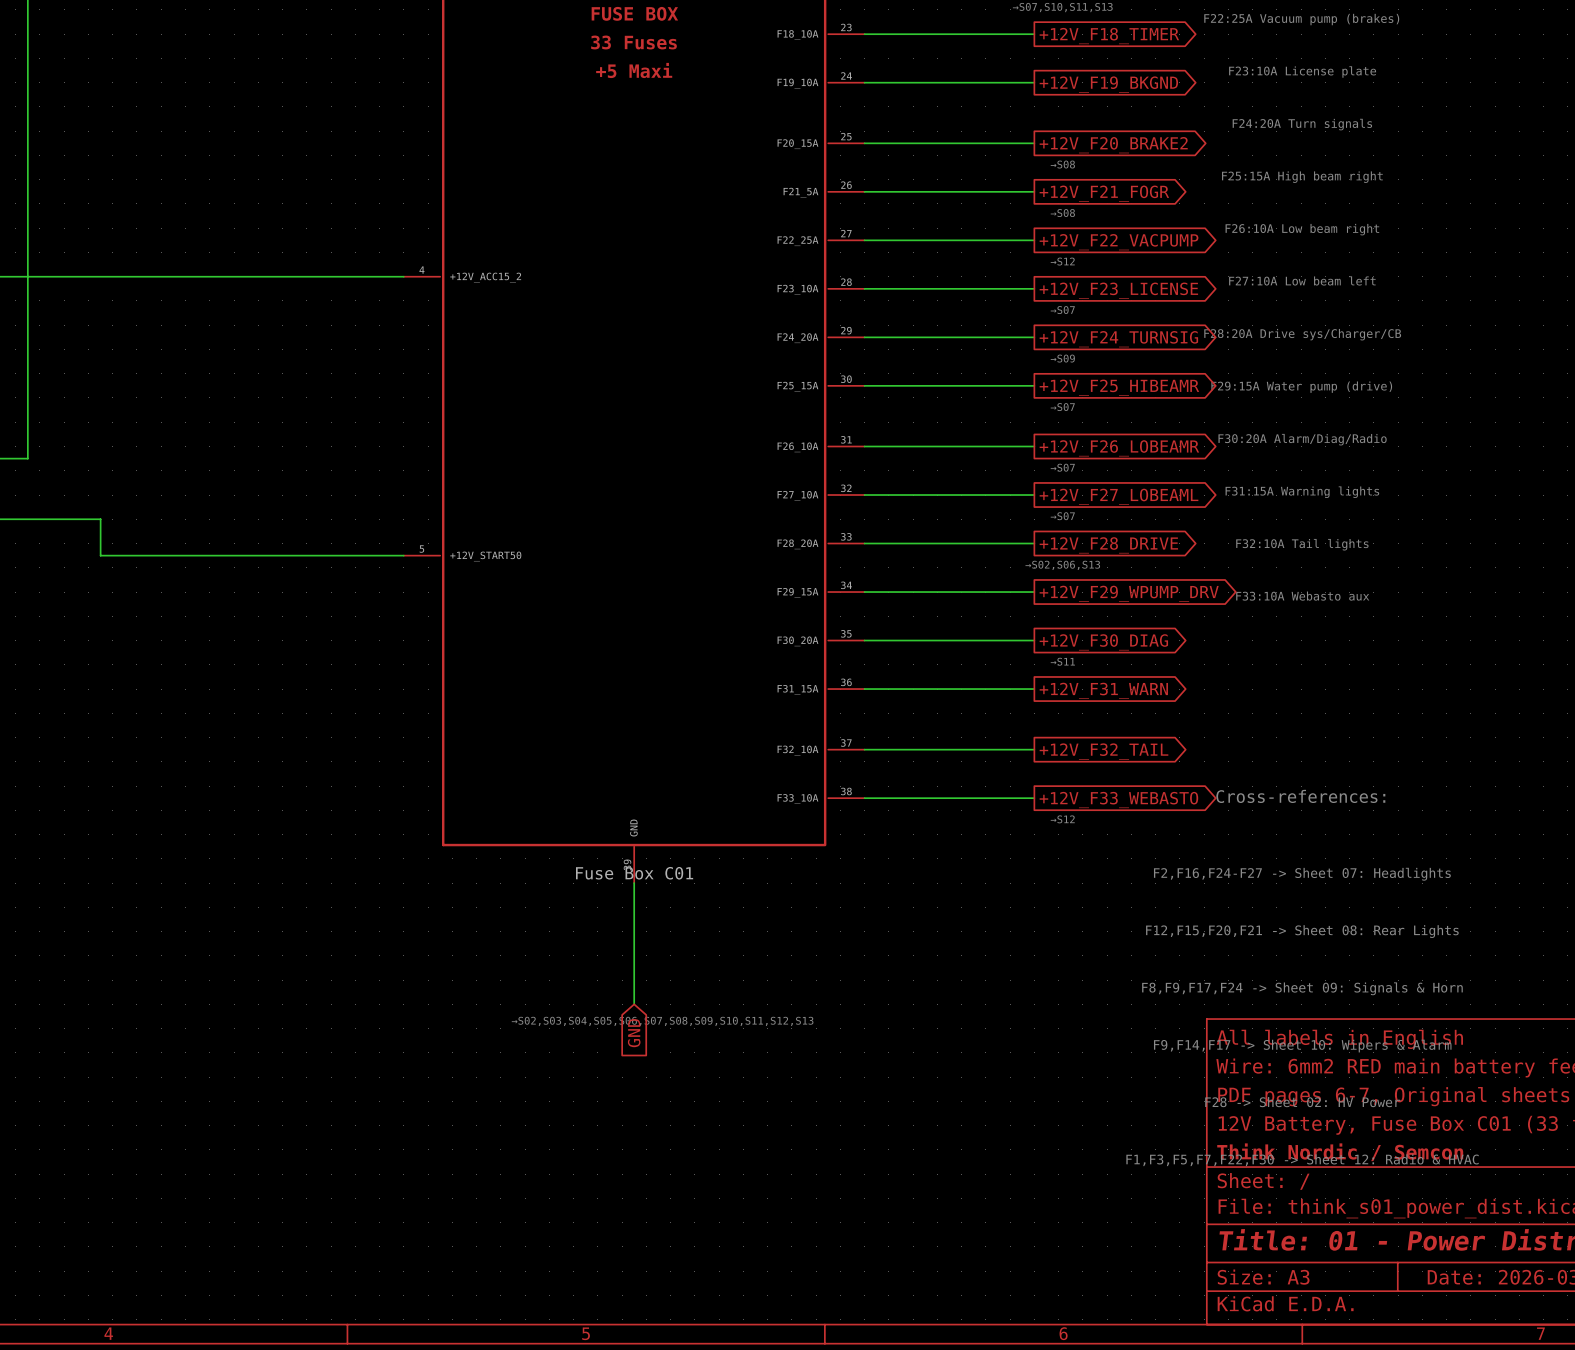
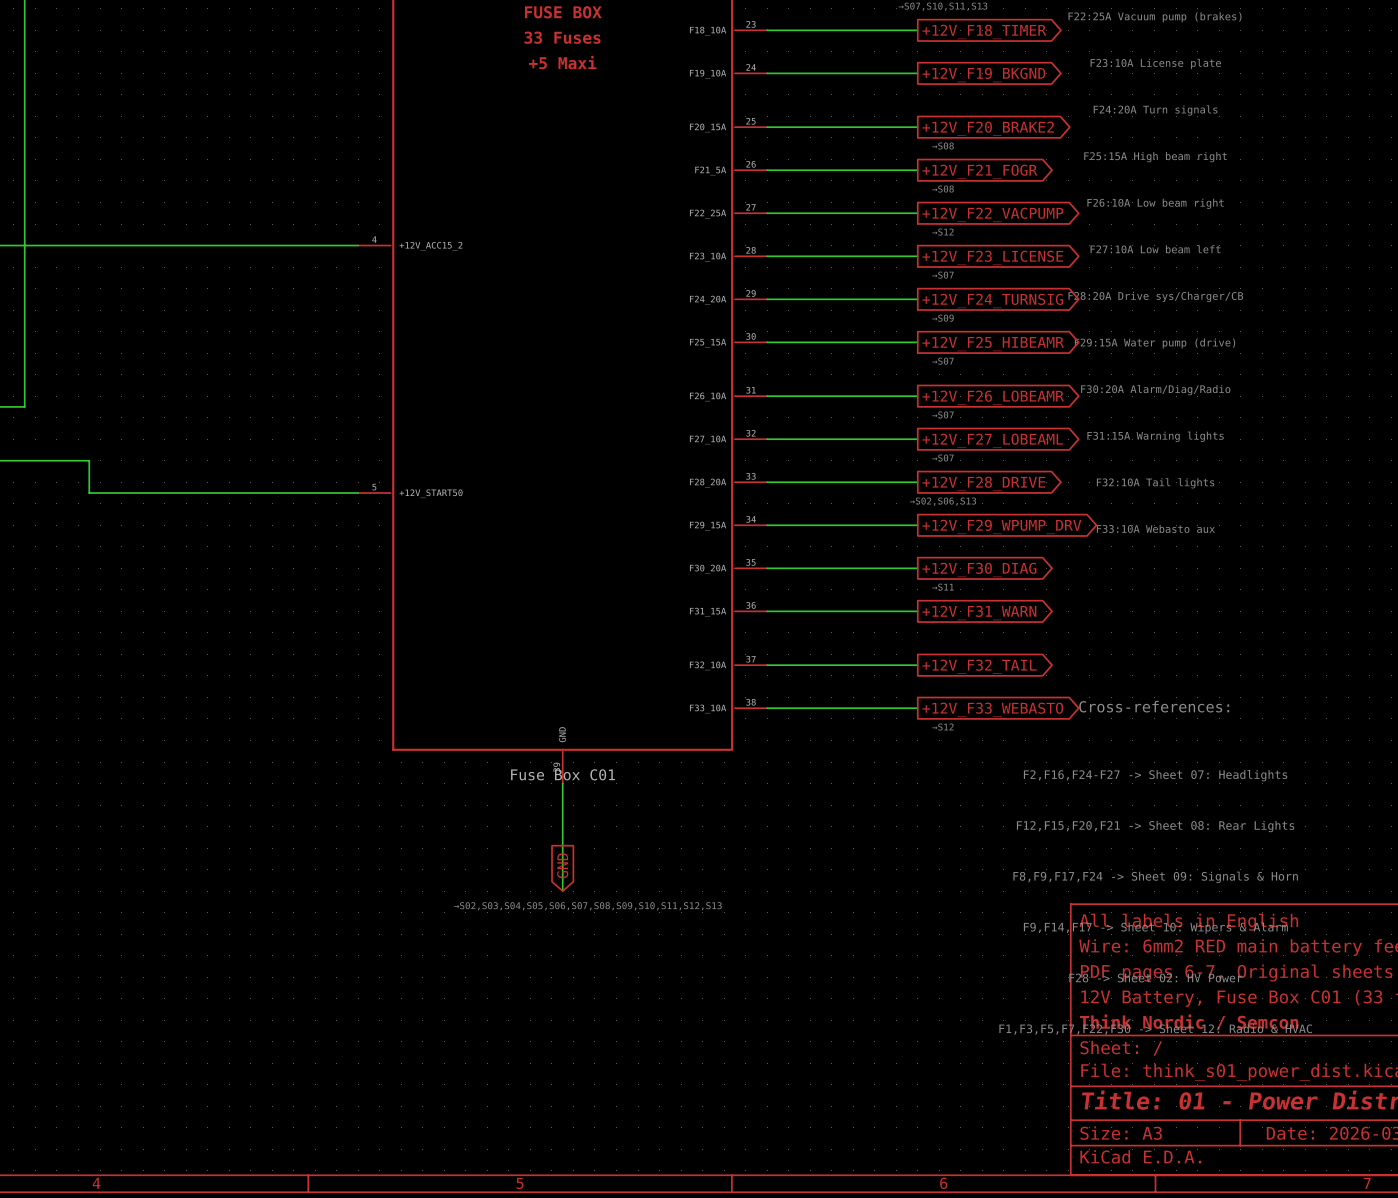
global label rotation: 0° (634, 1033) -> 180° (562, 865)

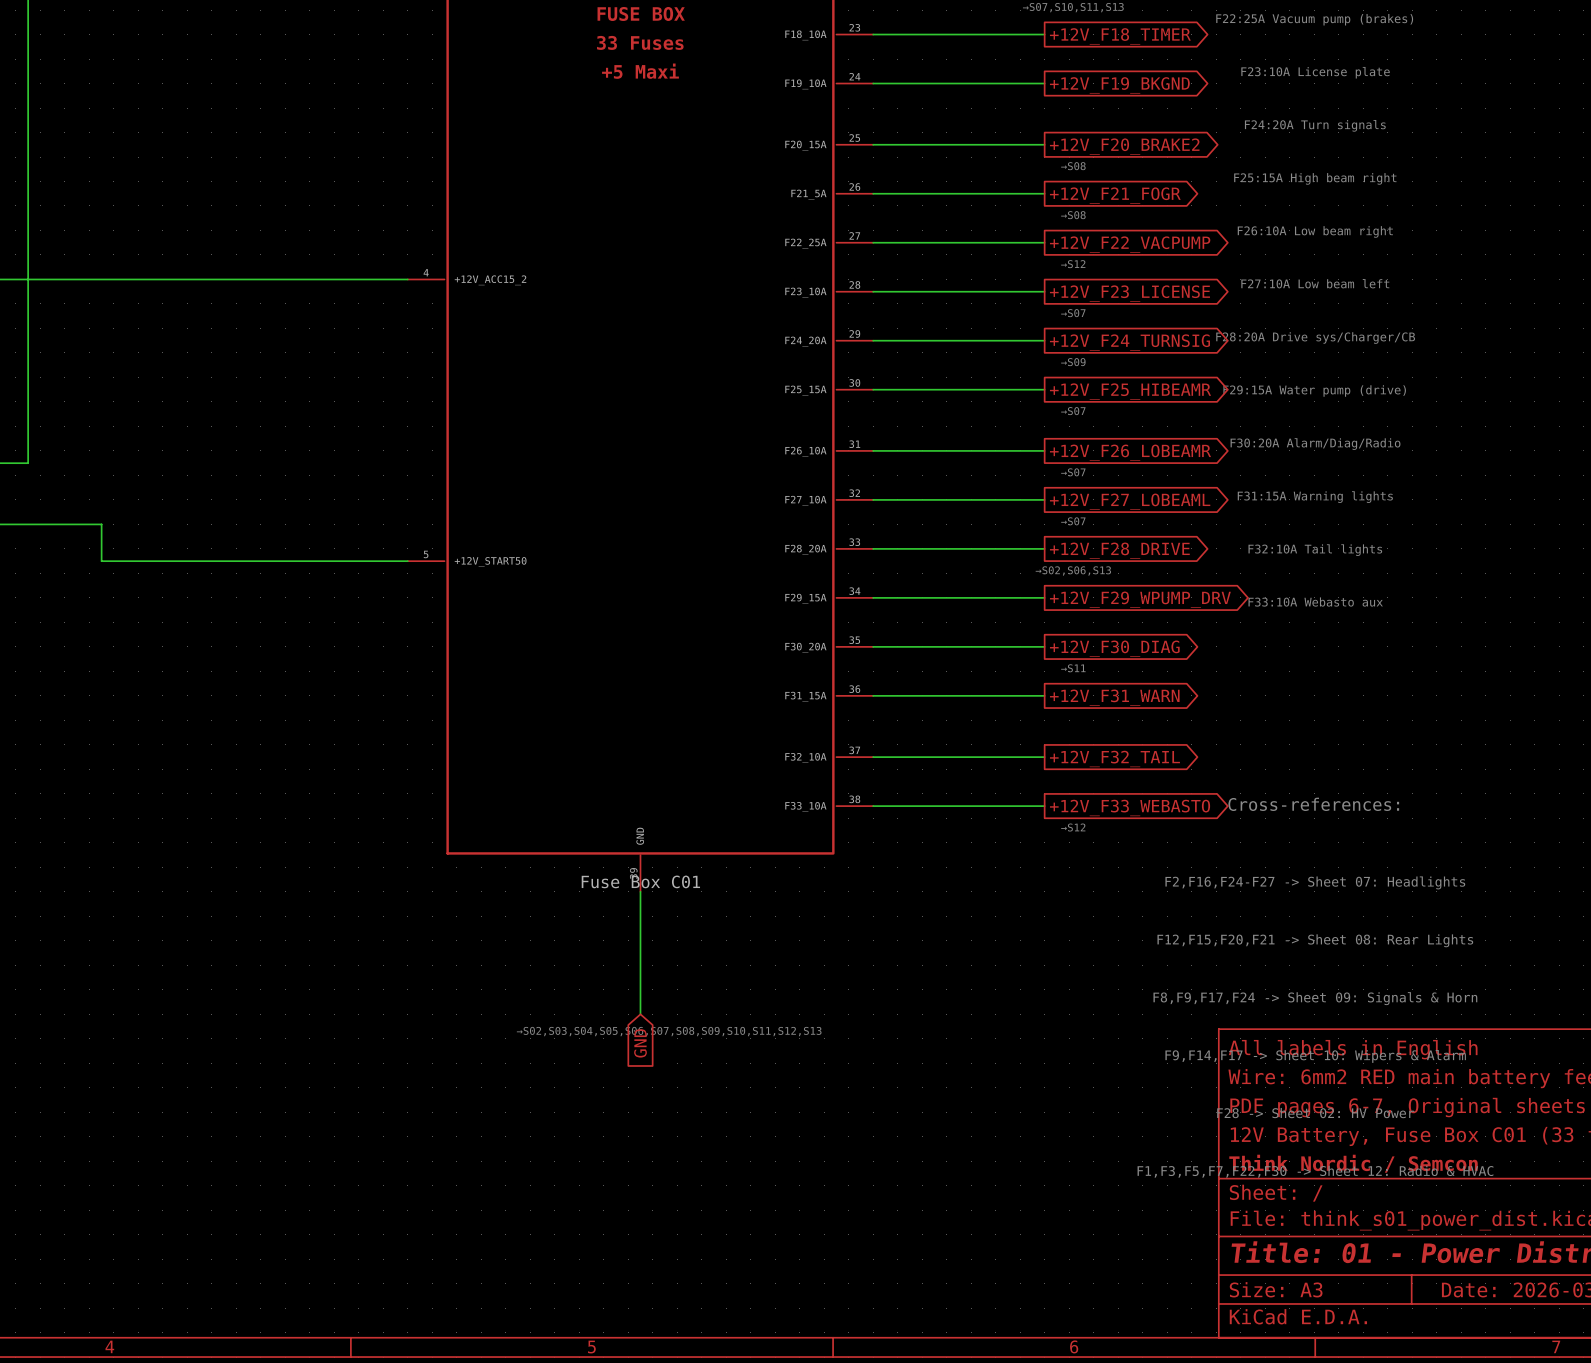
global label rotation: 0° (562, 865) -> 180° (640, 1043)

